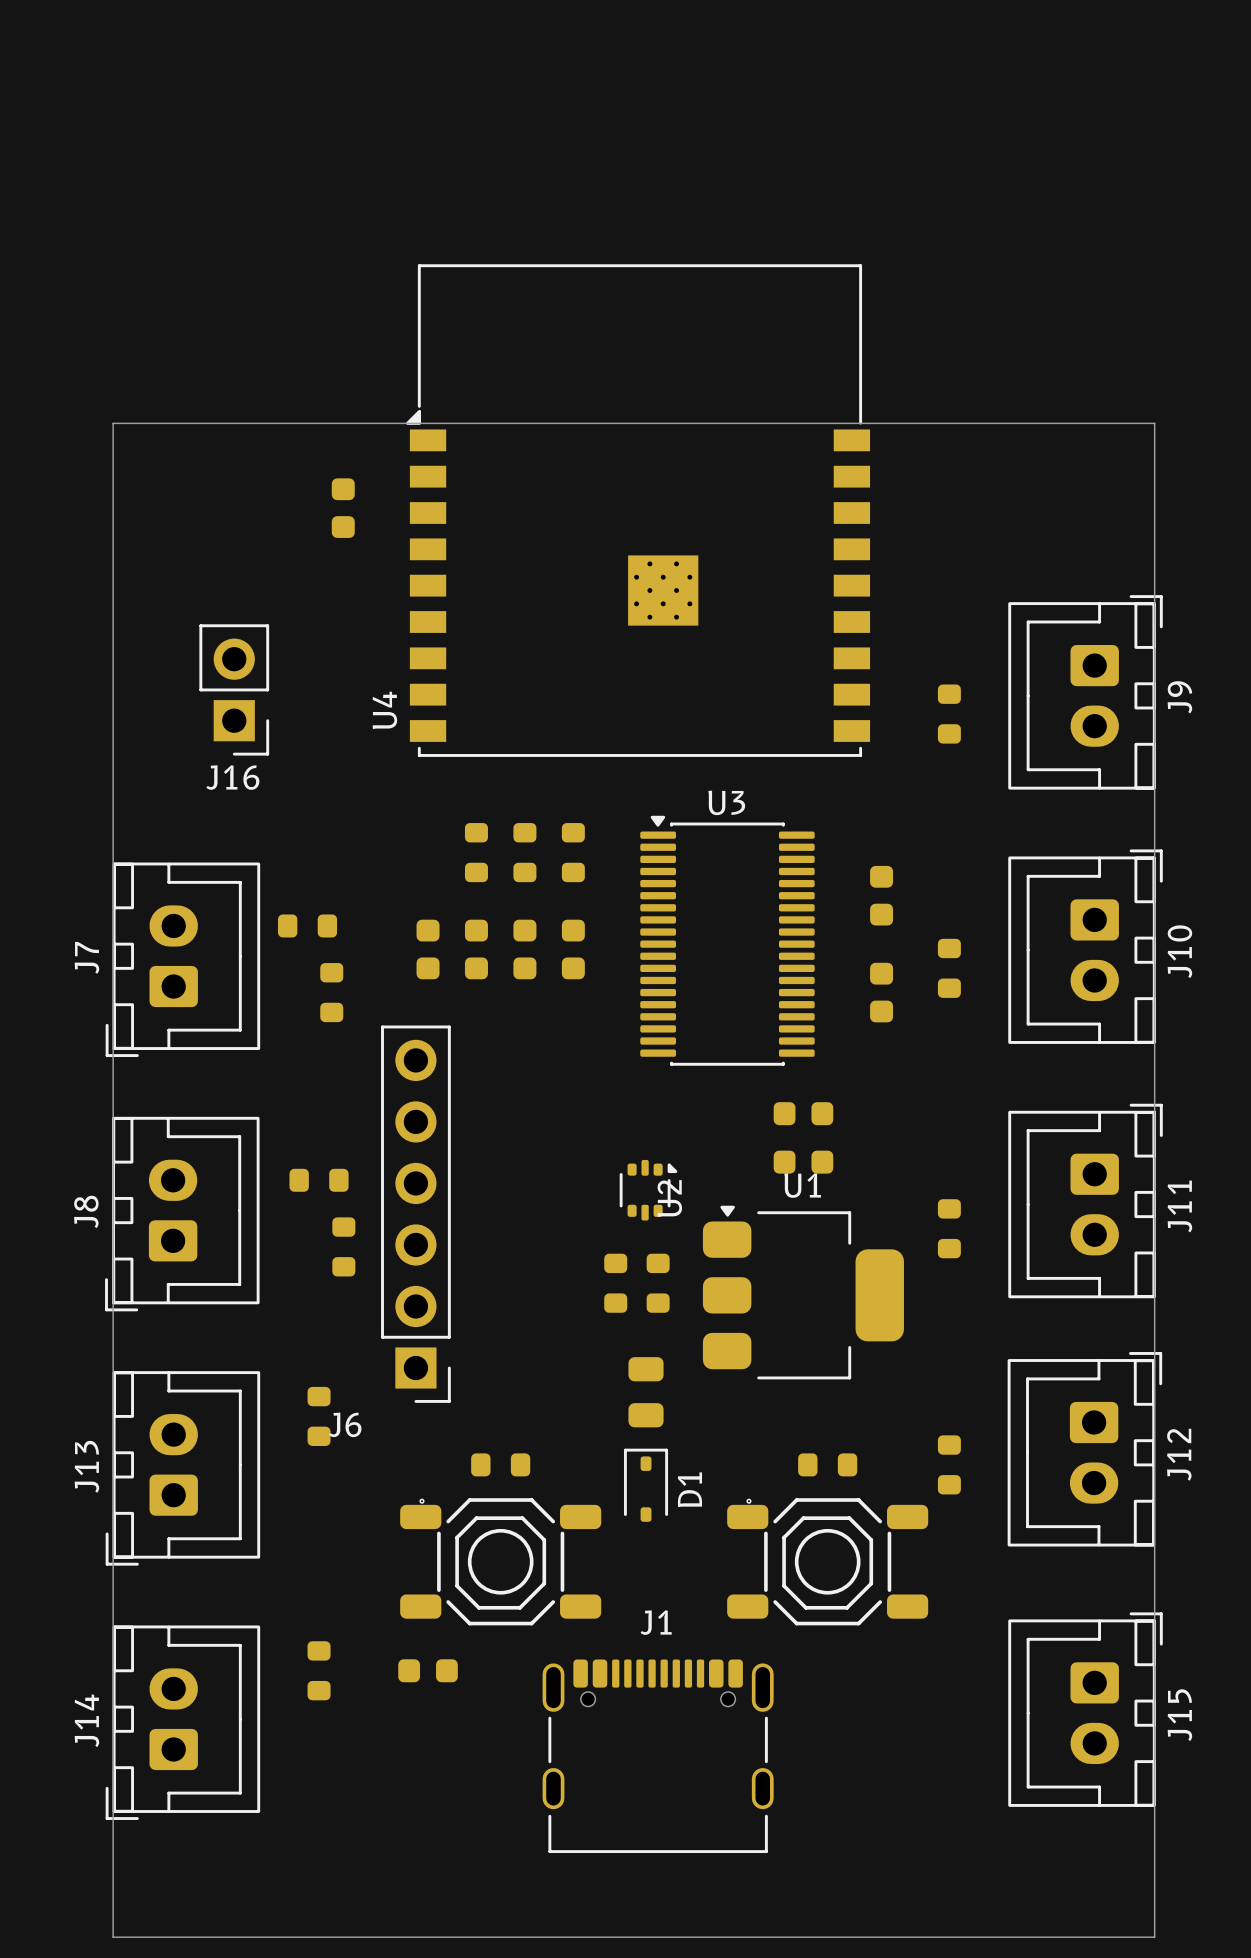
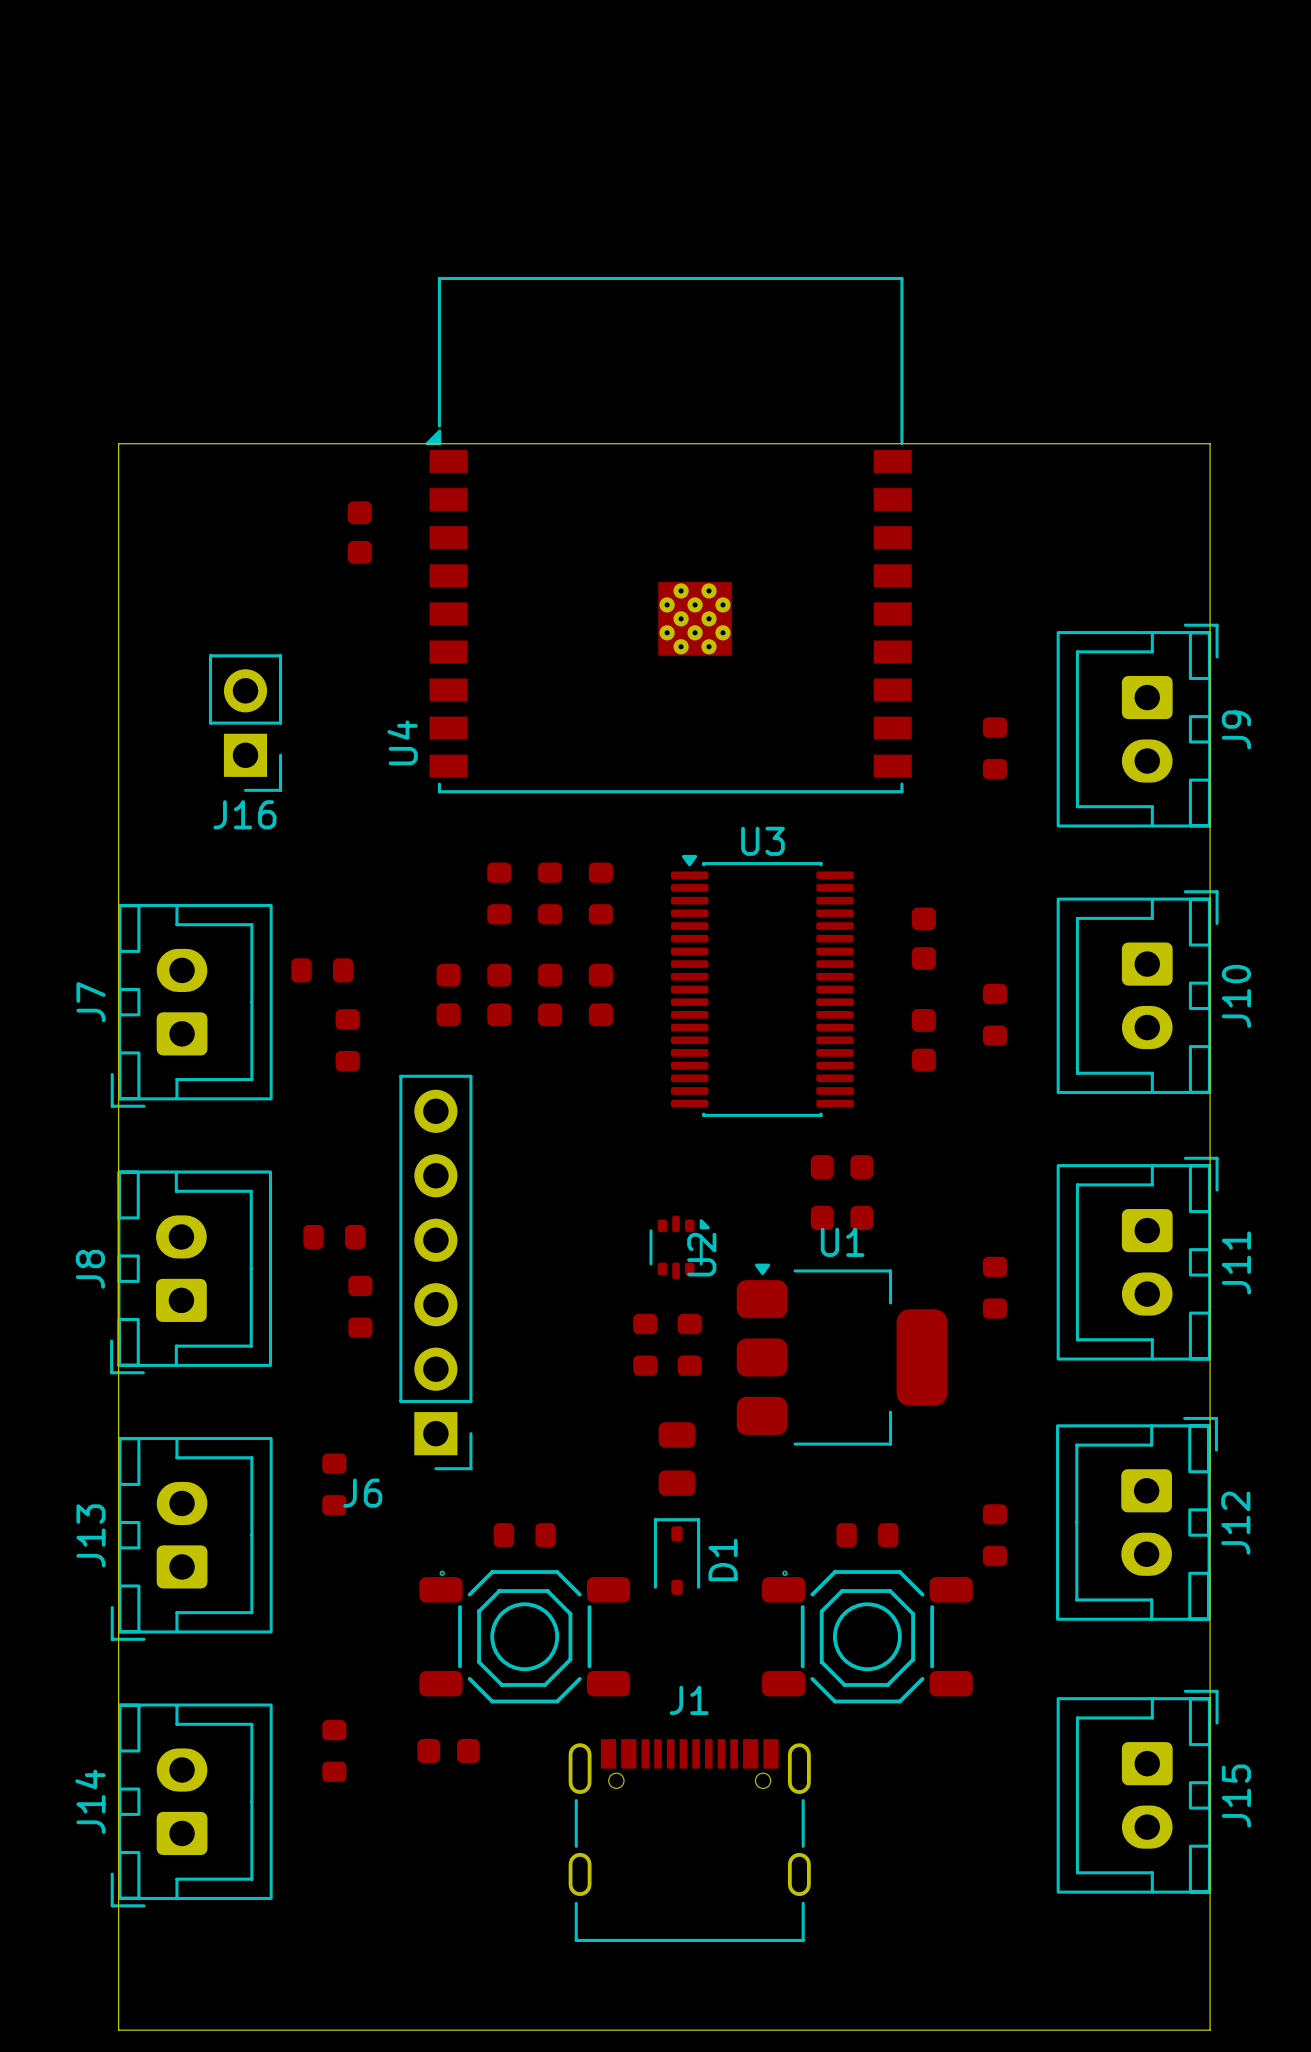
J1 footprint: [542, 1659, 774, 1854] -> [568, 1739, 811, 1942]

